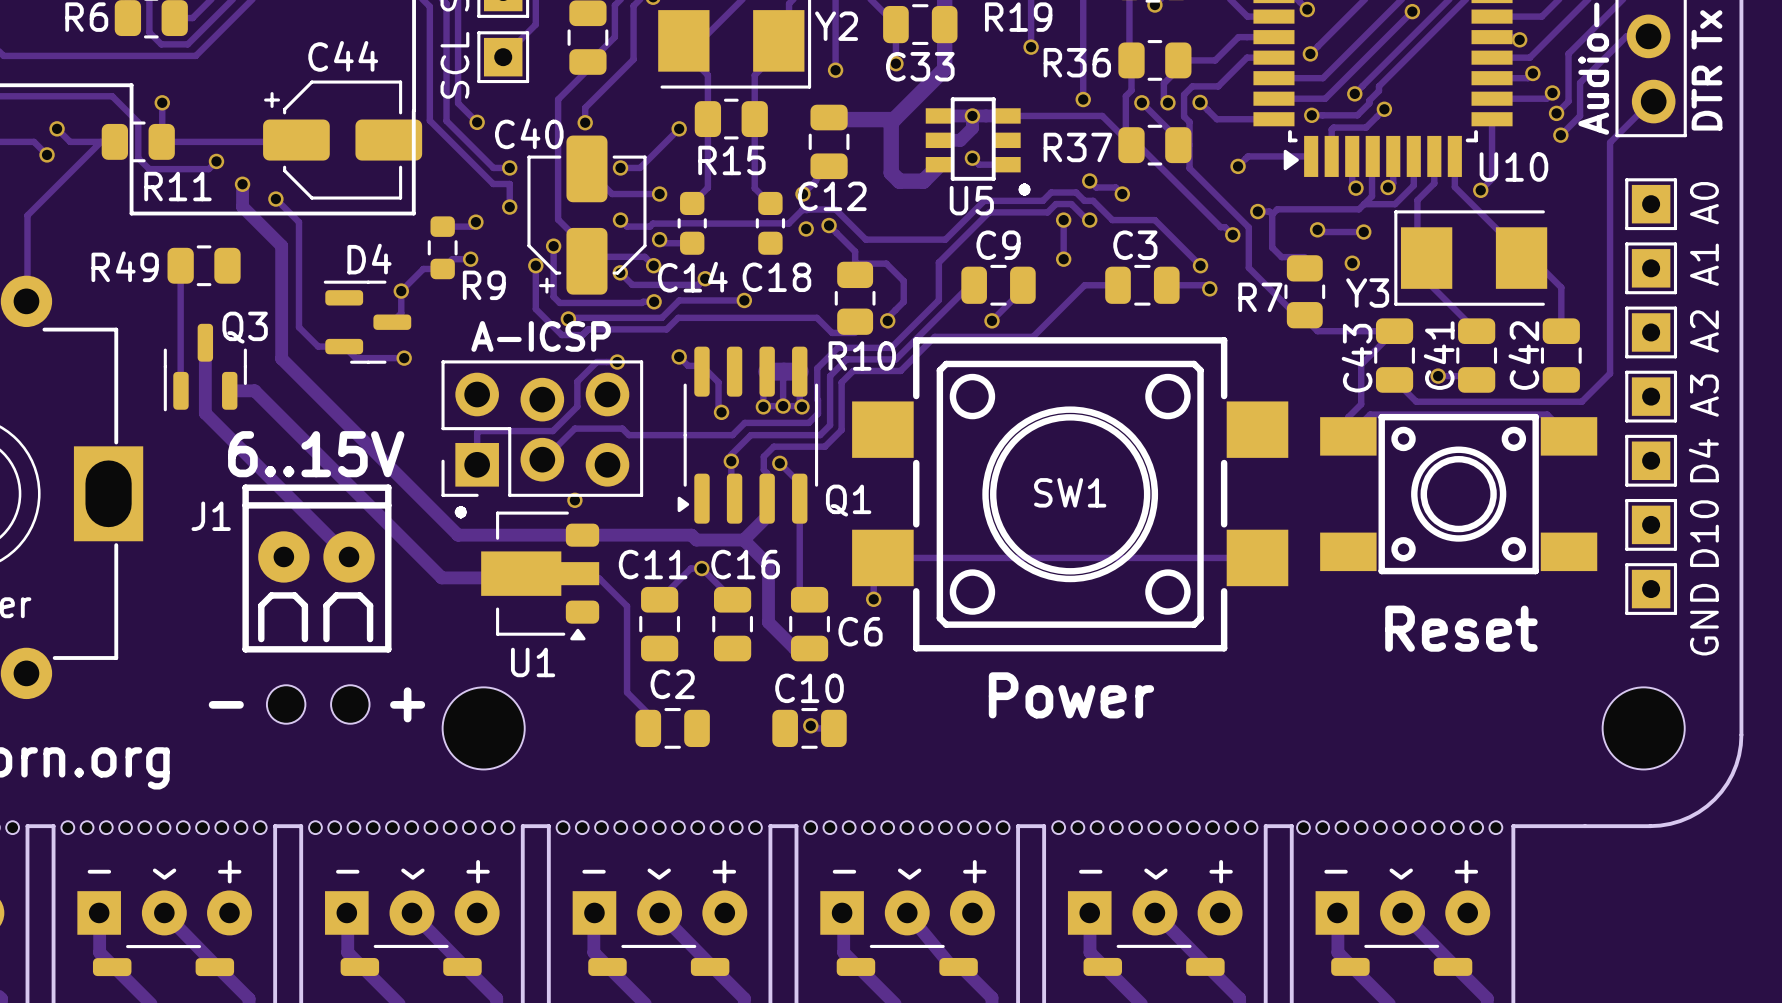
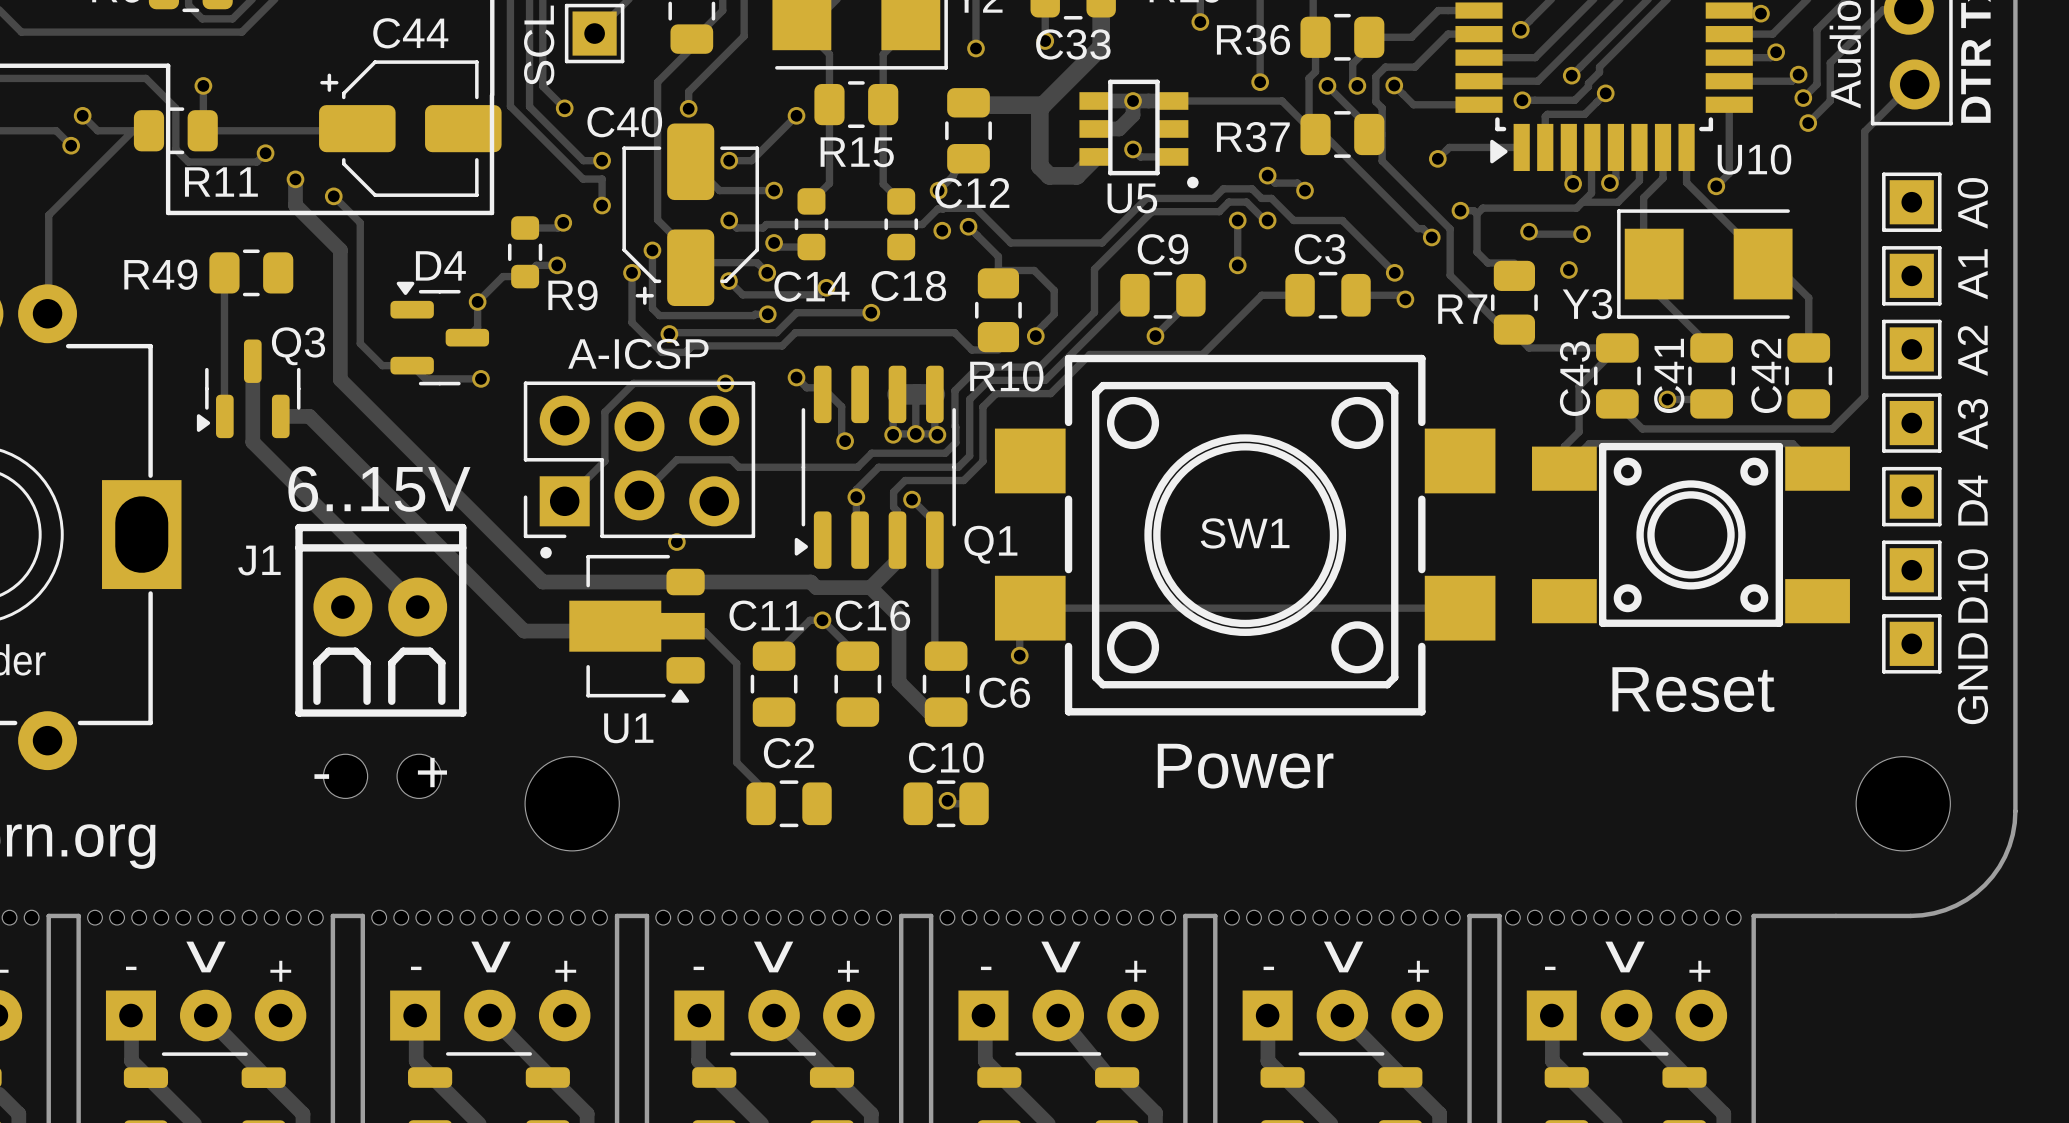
D4 footprint: [323, 280, 412, 364] -> [390, 281, 490, 386]
Q3 footprint: [163, 323, 247, 412] -> [196, 339, 301, 439]
track: (596, 362) (577, 381) (577, 406) (552, 431) (479, 431) (477, 432) (477, 461) -> (702, 383) (633, 383) (604, 412) (604, 461) (564, 501)

